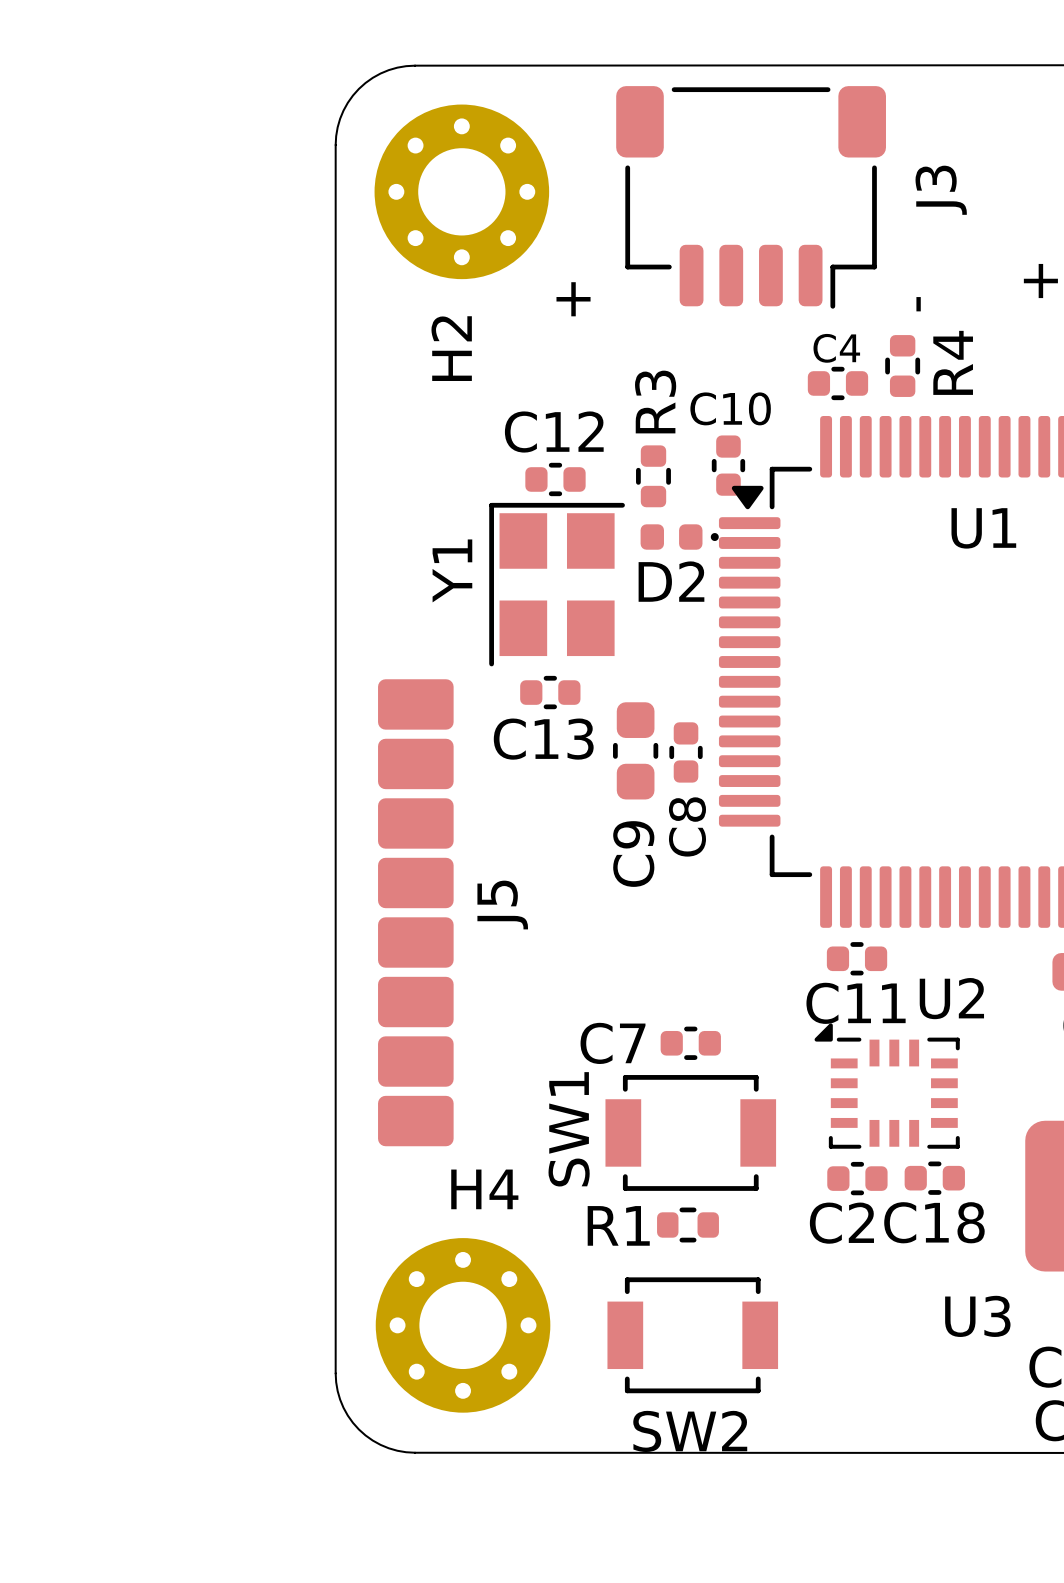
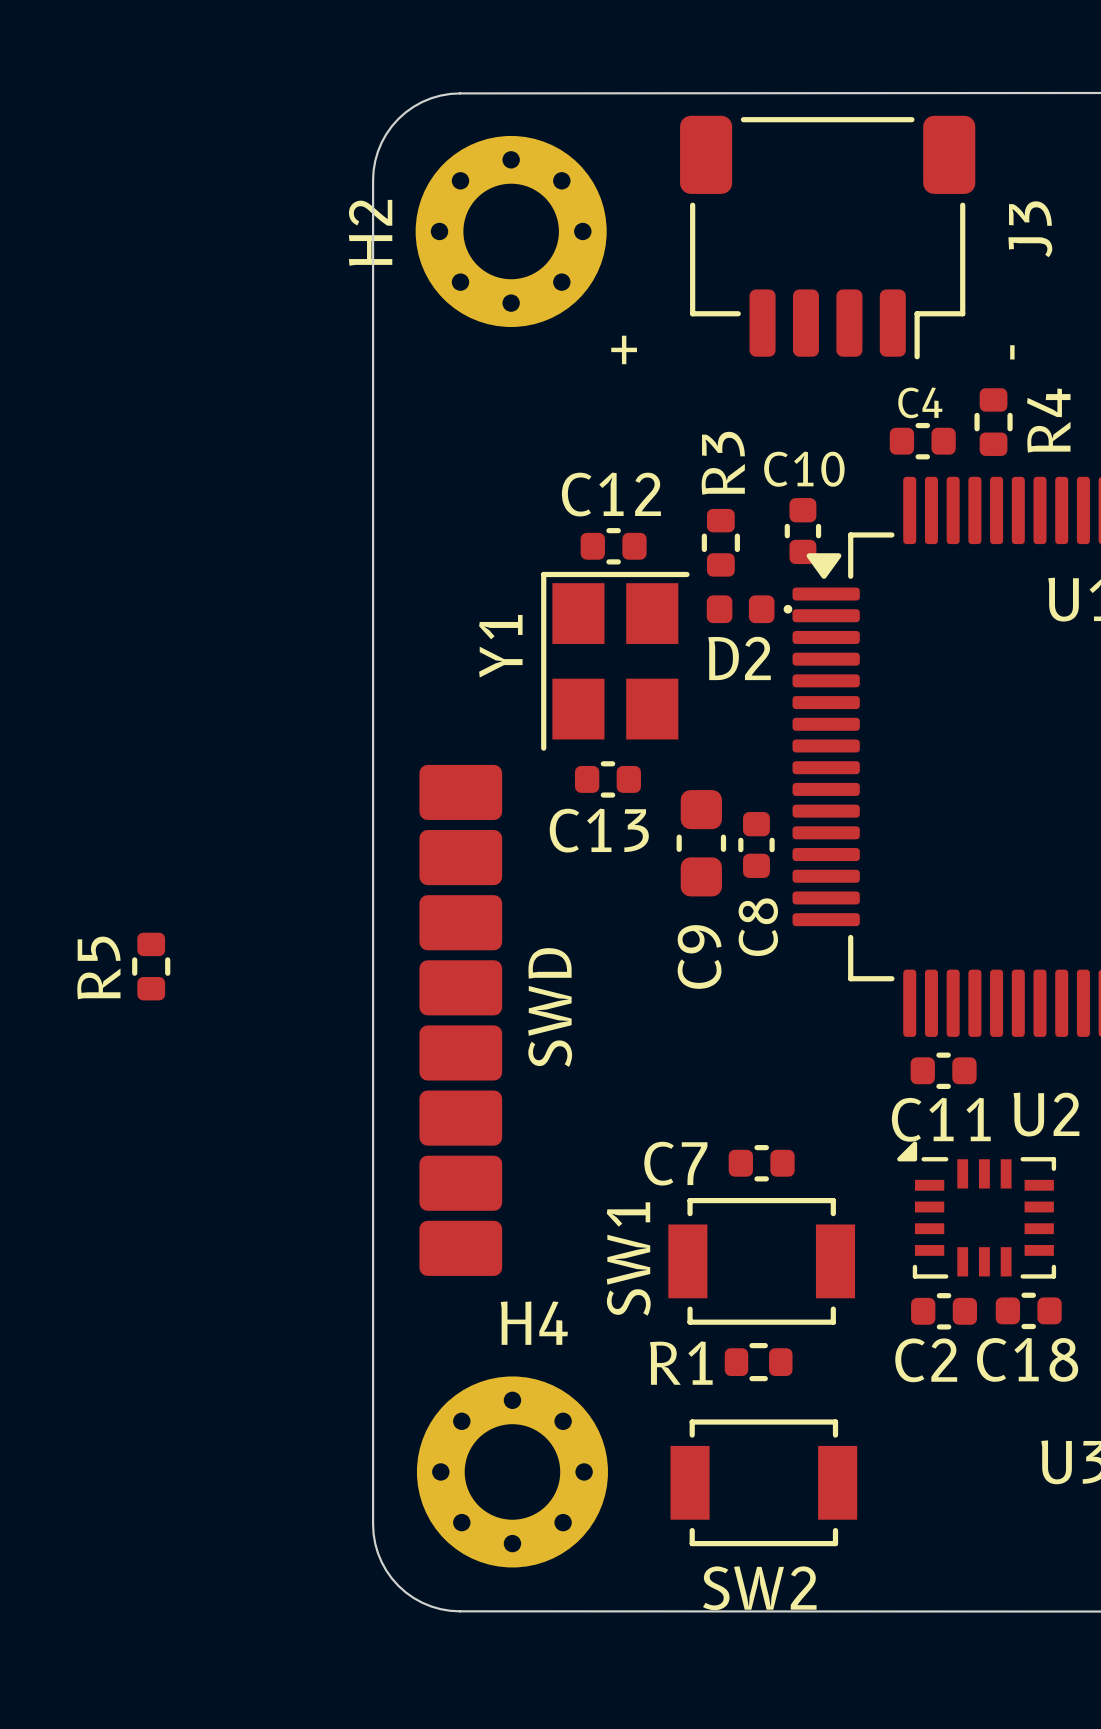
H2 name position: H2 (451, 348) -> H2 (370, 232)
R5: none -> (151, 966)
J5 name: J5 (502, 905) -> SWD (550, 1007)

